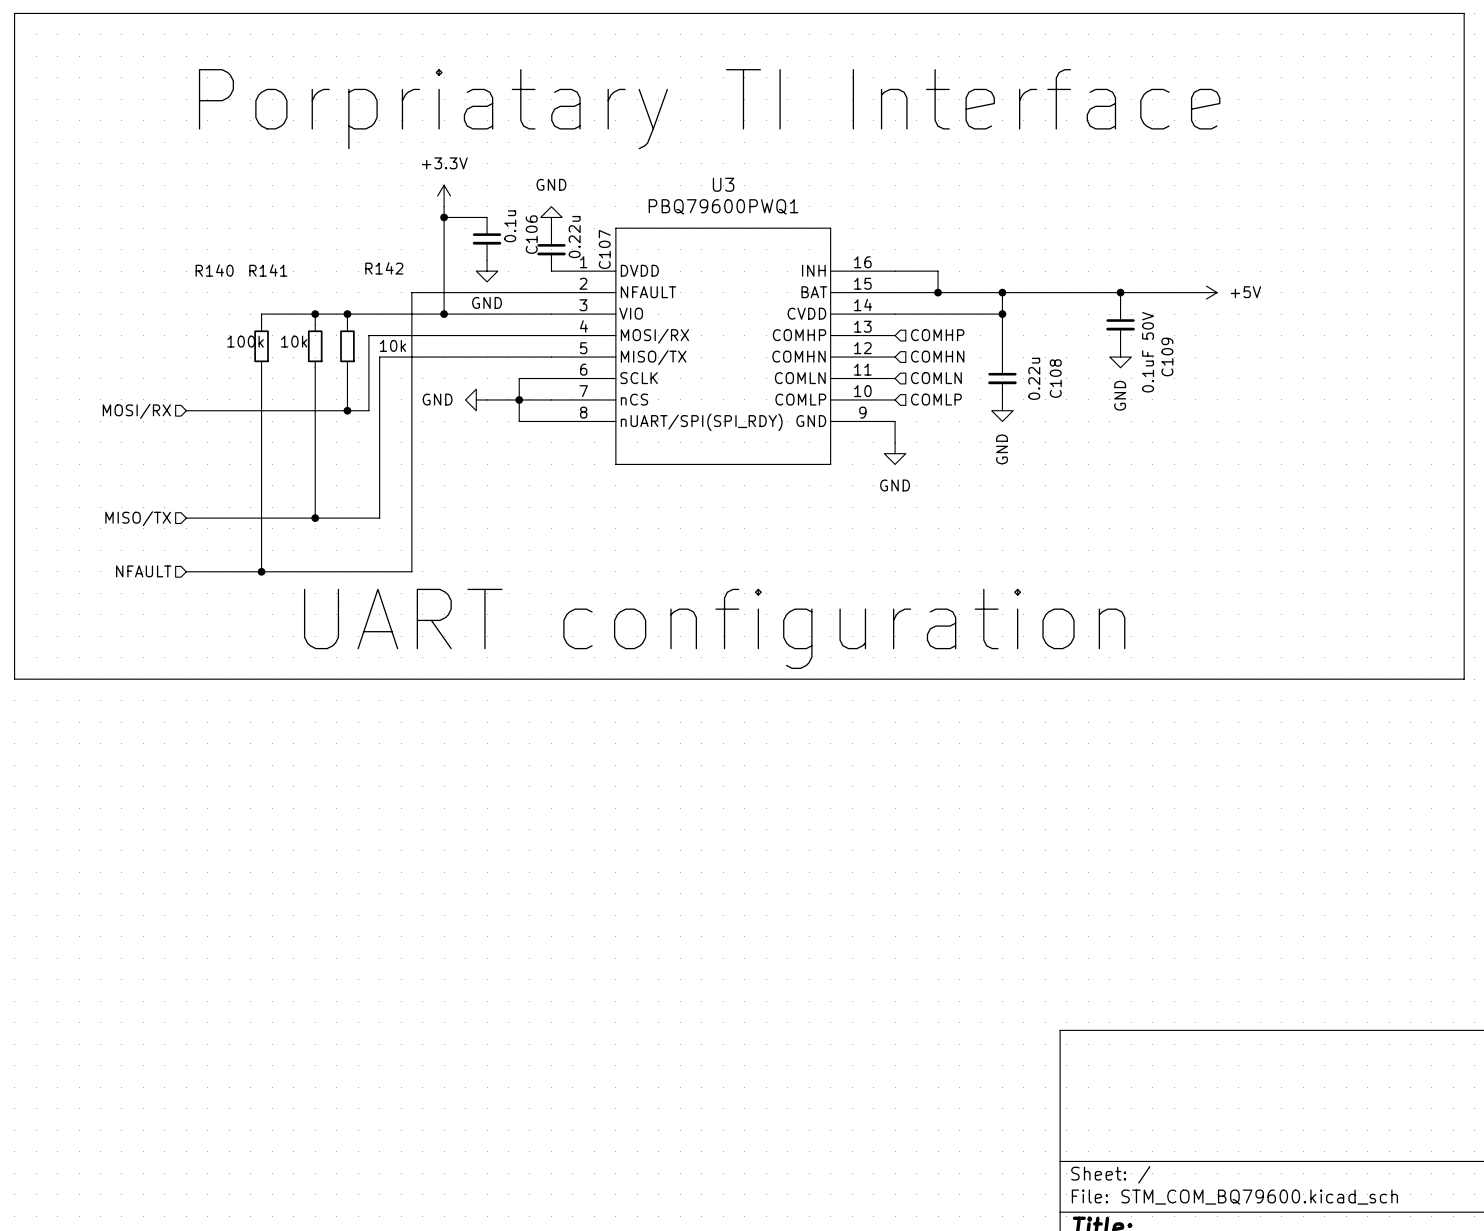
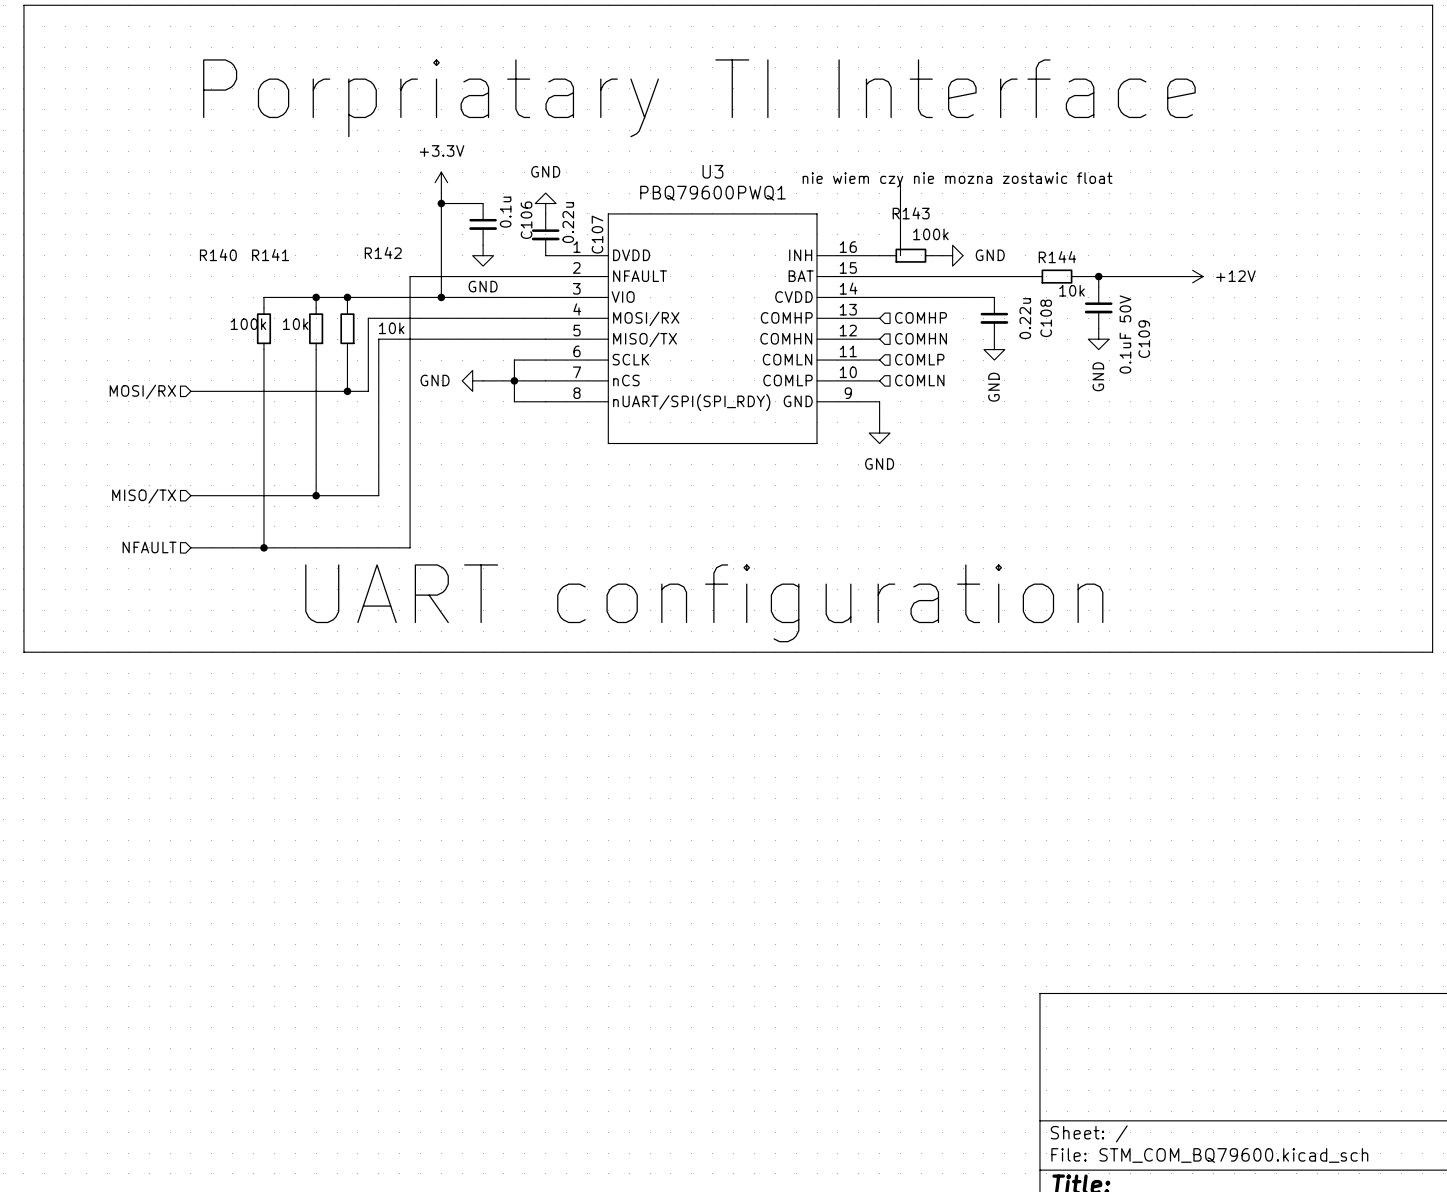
text: none -> nie wiem czy nie mozna zostawic float (957, 179)
line: none -> (900, 182) (900, 255)
wire: (905, 271) (938, 271) (938, 292) -> none
R143: none -> 100k (910, 255)
wire: none -> (931, 255) (942, 255)
power symbol: none -> GND (952, 255)
junction: (938, 292) -> none
wire: (1002, 292) (1002, 357) -> none
junction: (1002, 292) -> none
wire: (1056, 292) (1099, 292) -> none
R144: none -> 10k (1056, 276)
power symbol: +5V (1206, 292) -> none
power symbol: none -> +12V (1192, 276)
wire: none -> (983, 297) (994, 297)
junction: (1002, 314) -> none
hierarchical label: COMLN (936, 378) -> COMLP (919, 359)
C108 position: (1002, 378) -> (994, 318)
hierarchical label: COMLP (936, 399) -> COMLN (919, 380)
power symbol position: GND (1002, 410) -> GND (994, 349)

